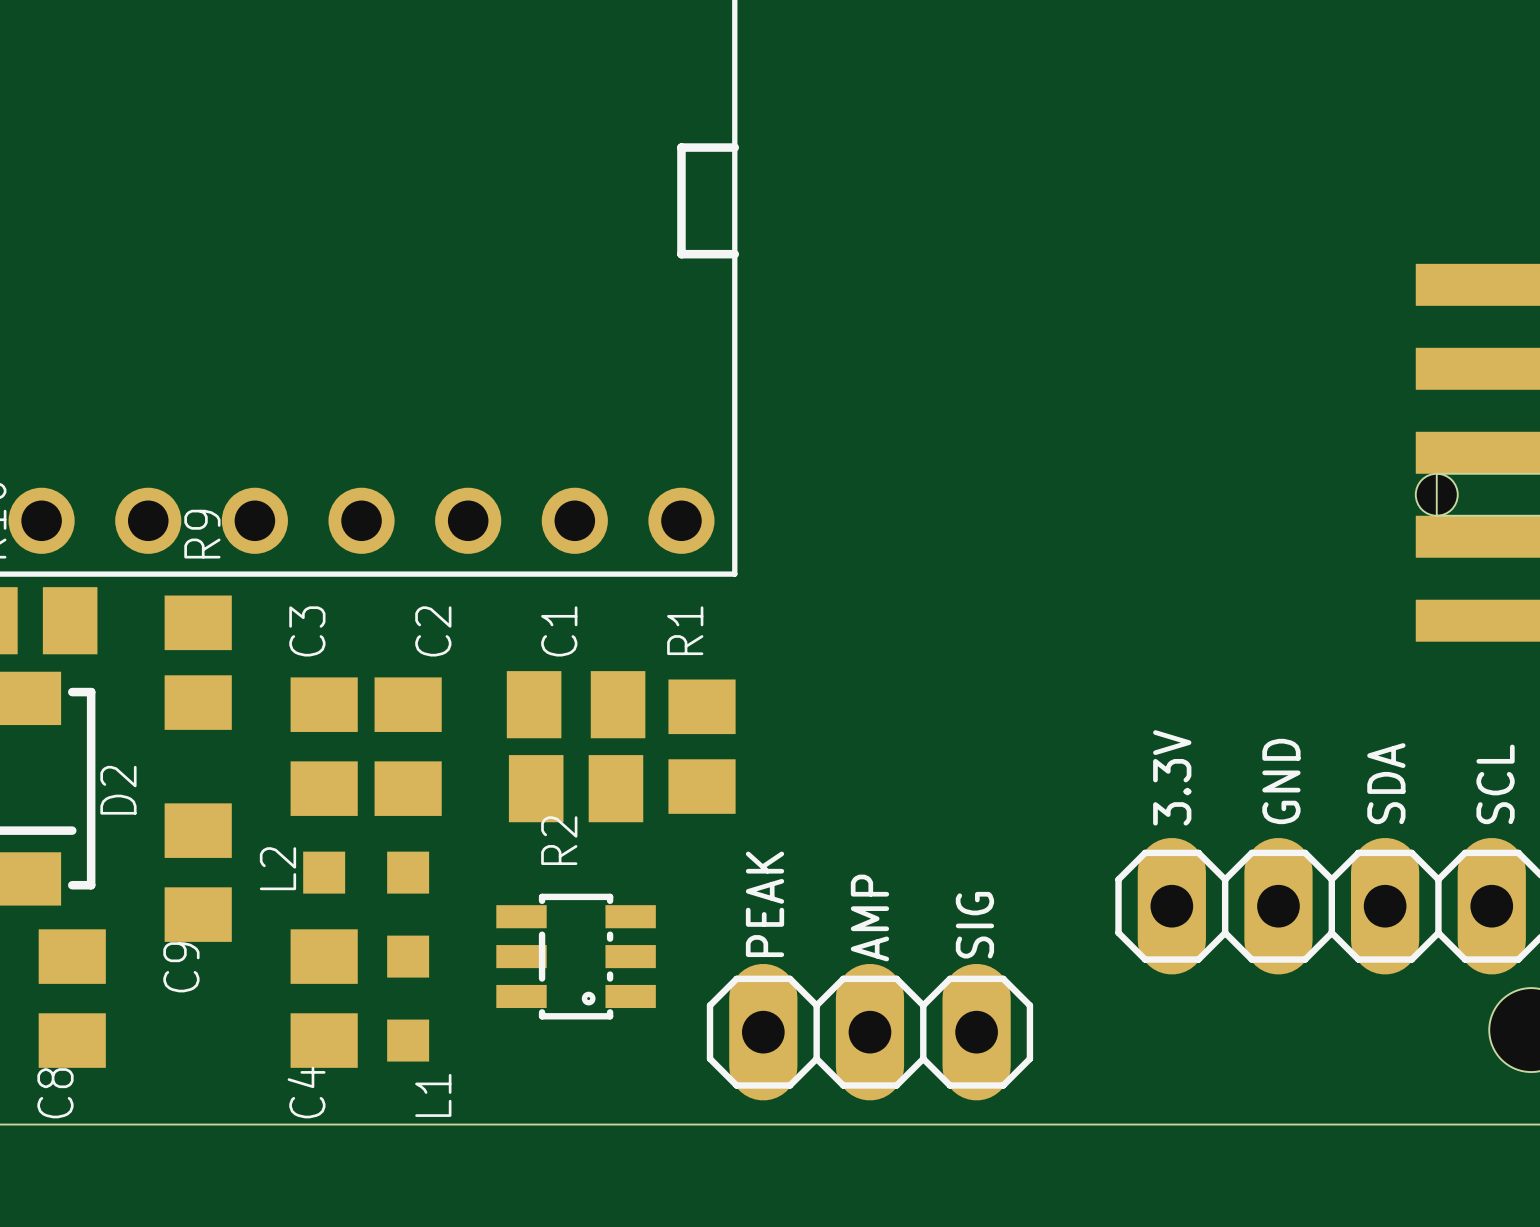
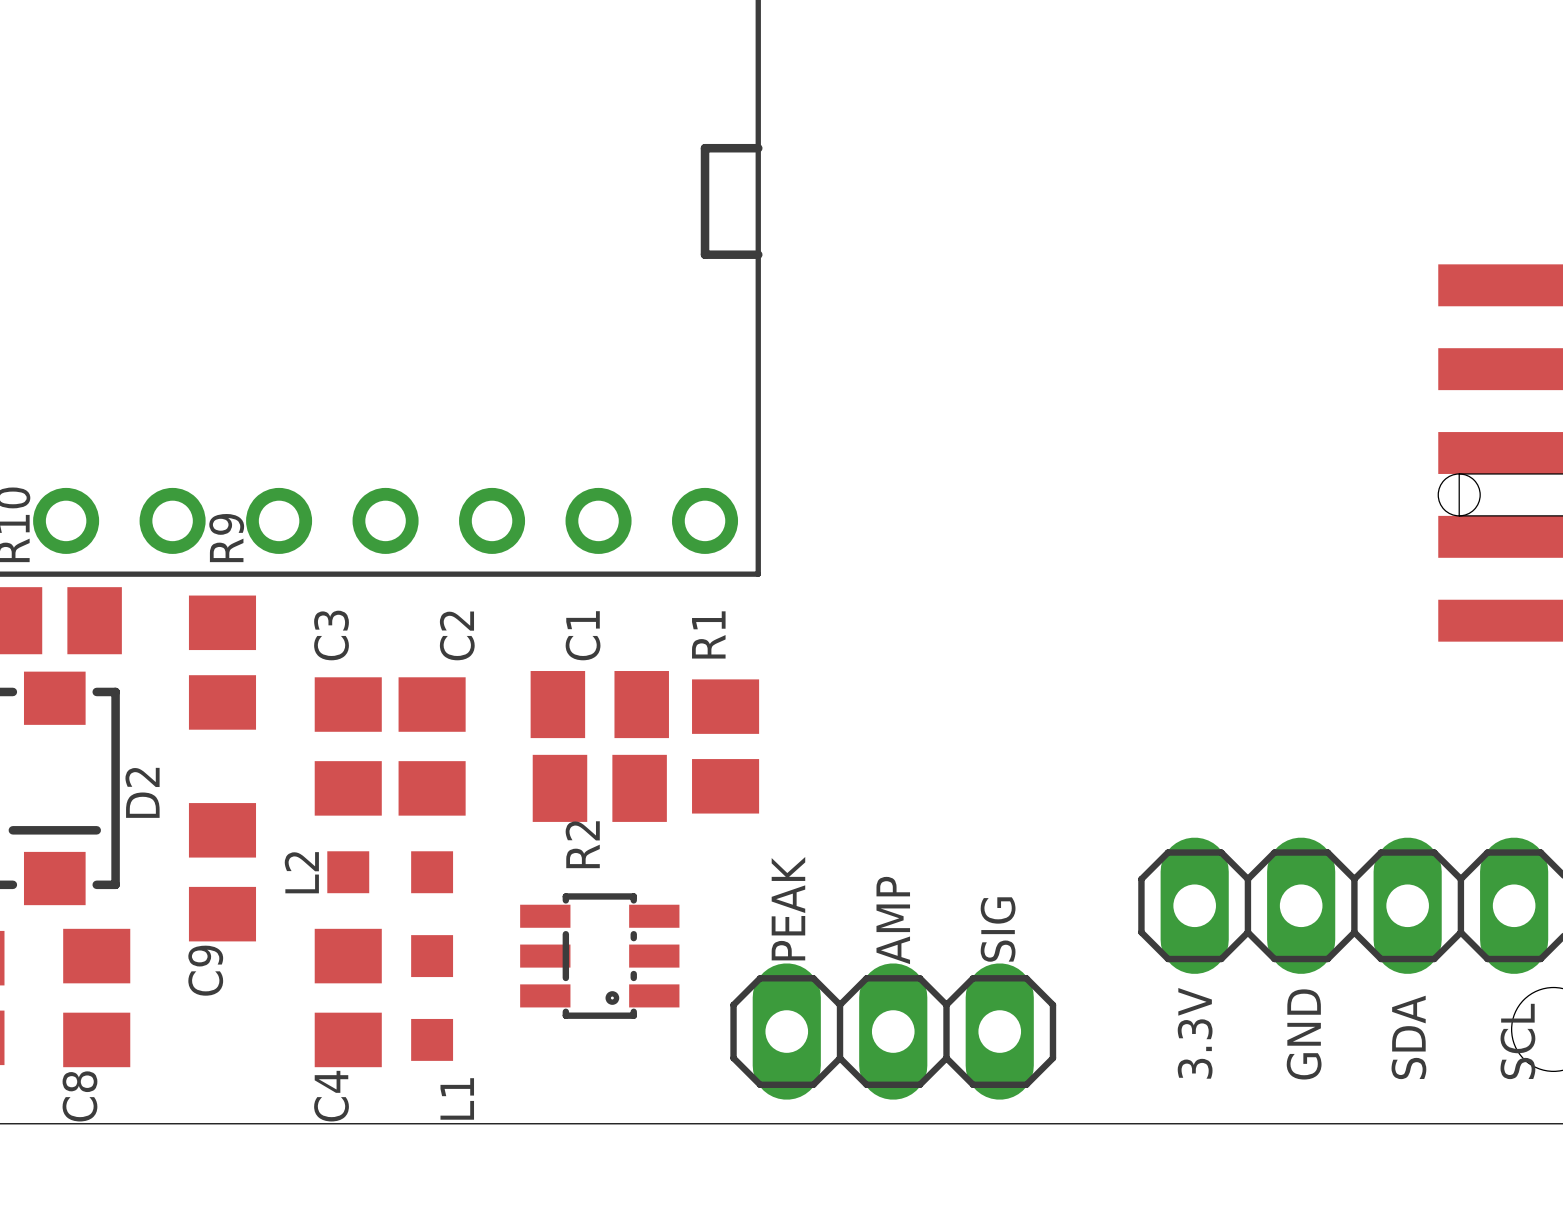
text position: 3.3V (1172, 777) -> 3.3V (1195, 1033)
text position: GND (1281, 781) -> GND (1304, 1034)
text position: SDA (1386, 783) -> SDA (1408, 1037)
text position: SCL (1495, 784) -> SCL (1517, 1041)

